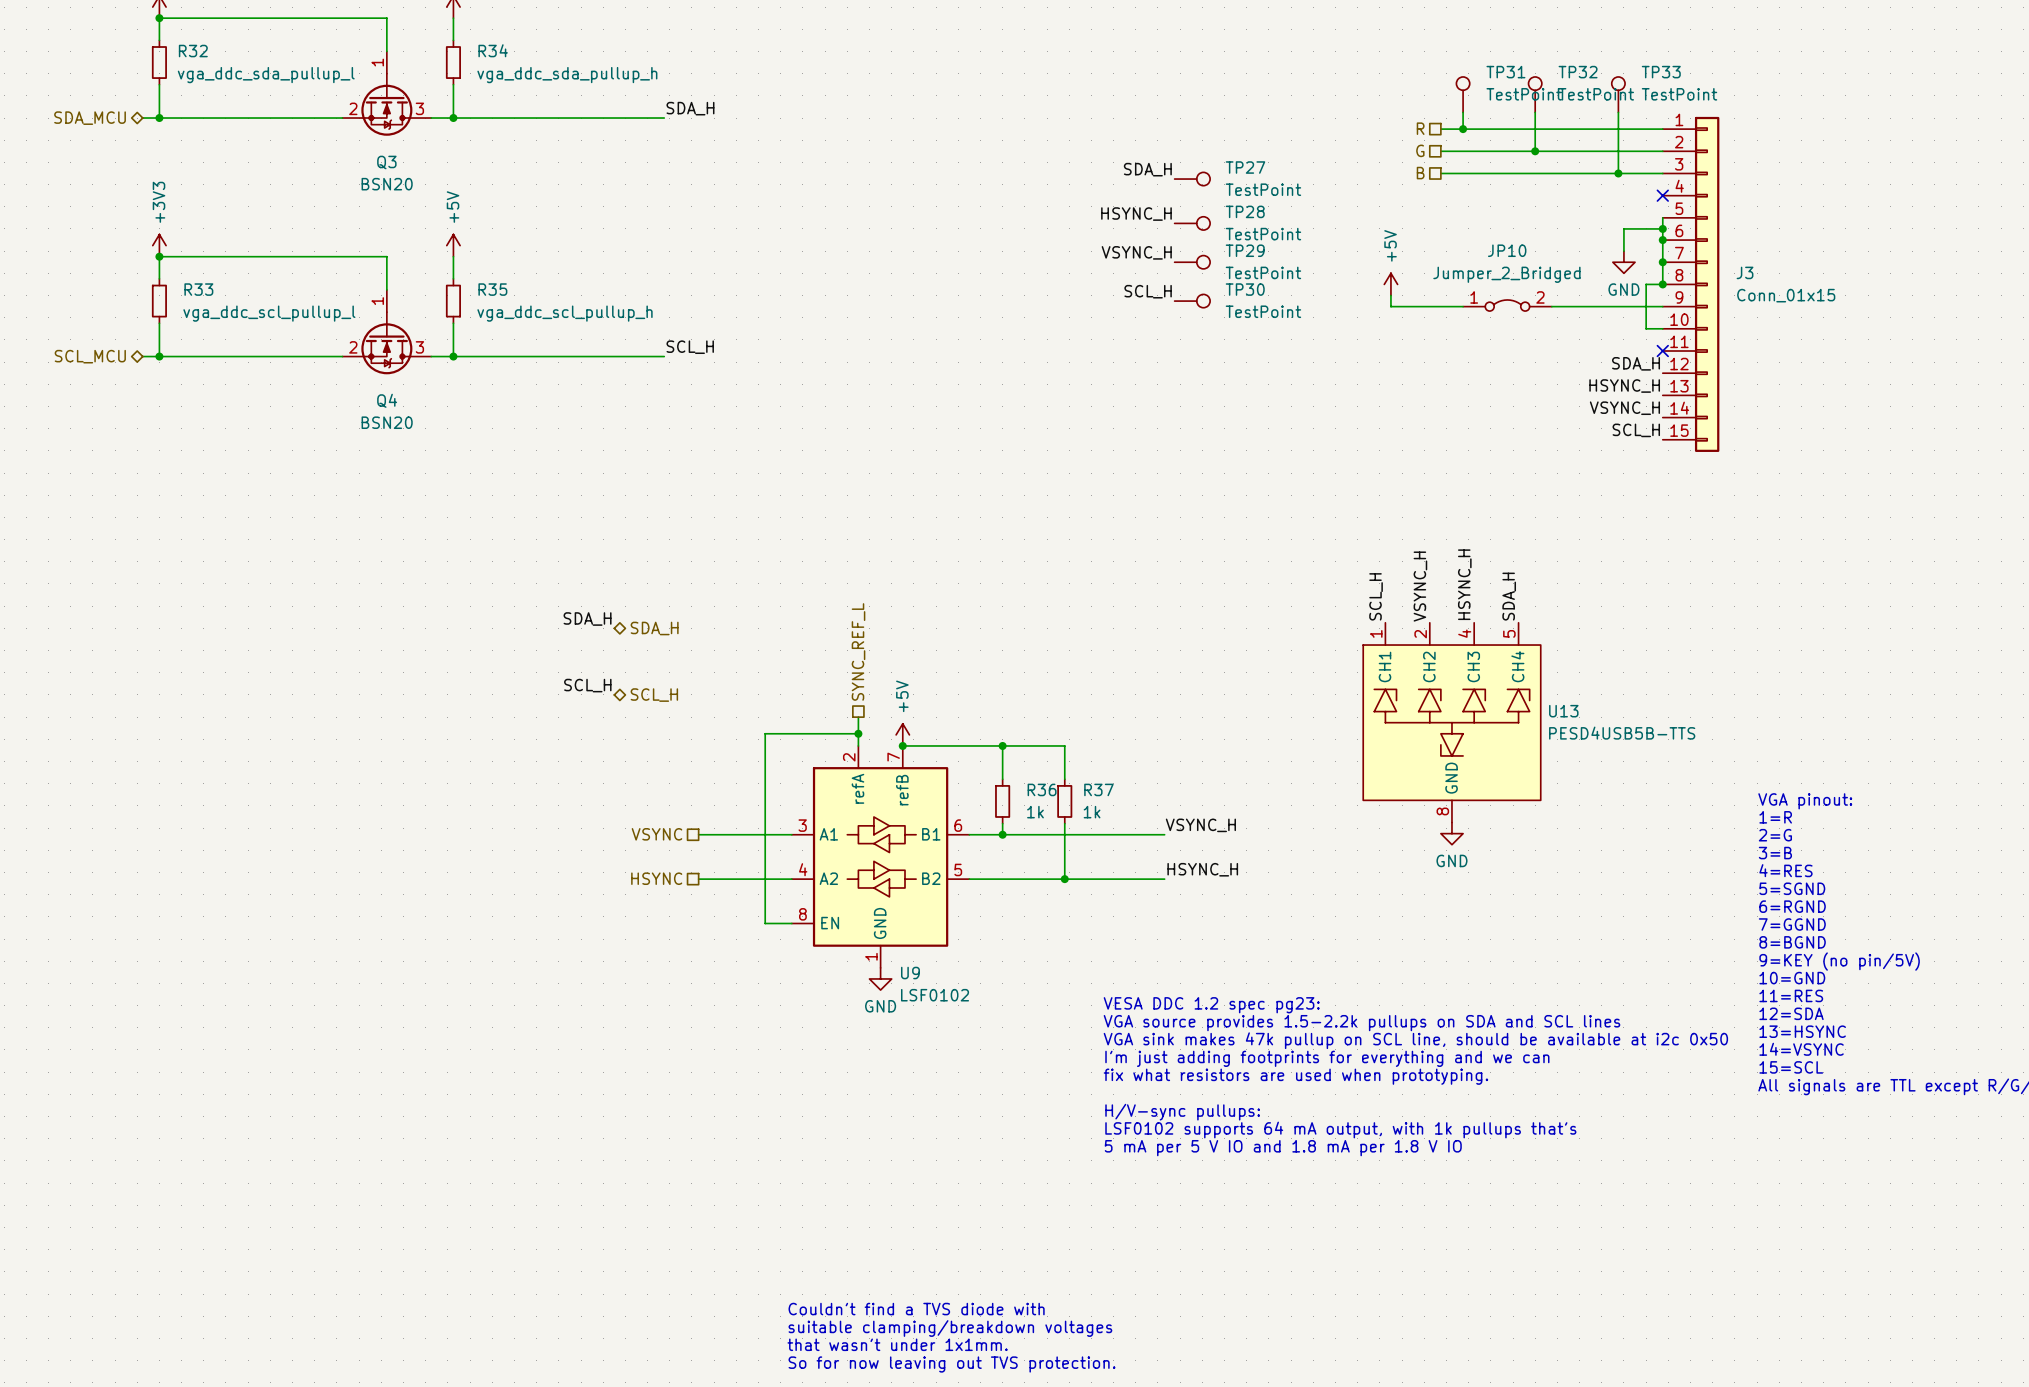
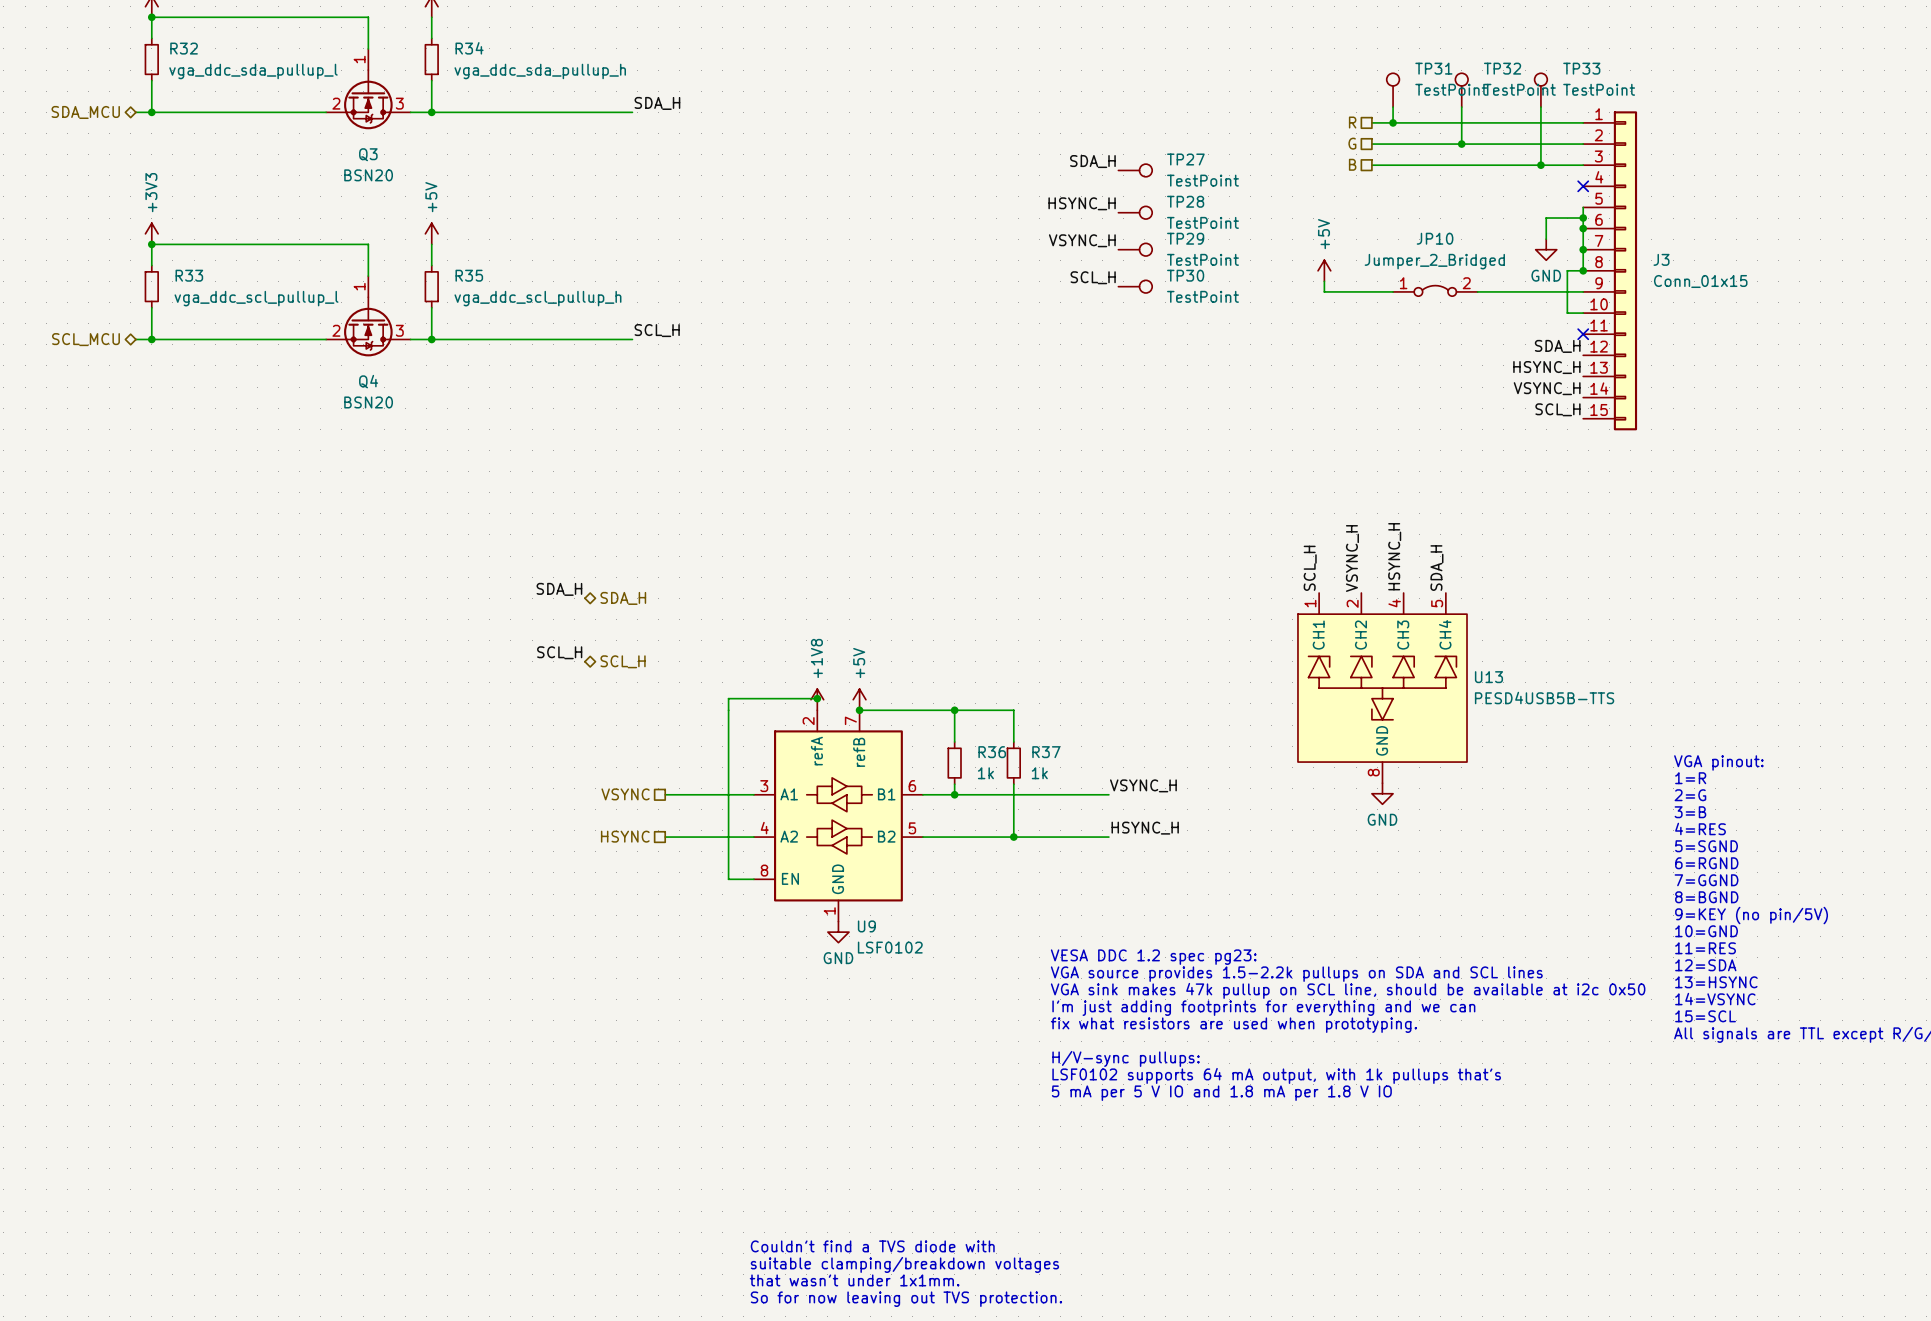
hierarchical label: SYNC_REF_L (858, 651) -> none
power symbol: none -> +1V8 (817, 699)

